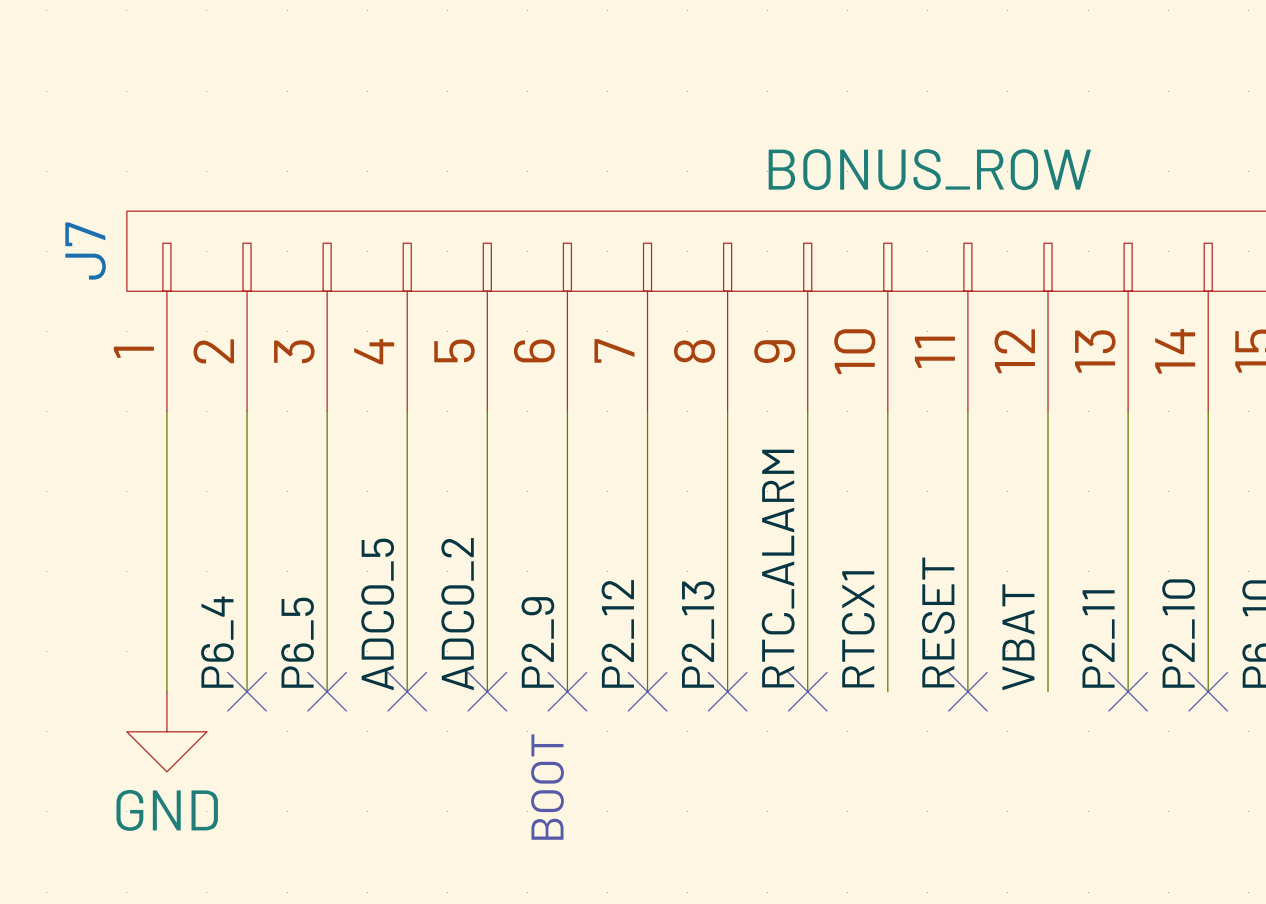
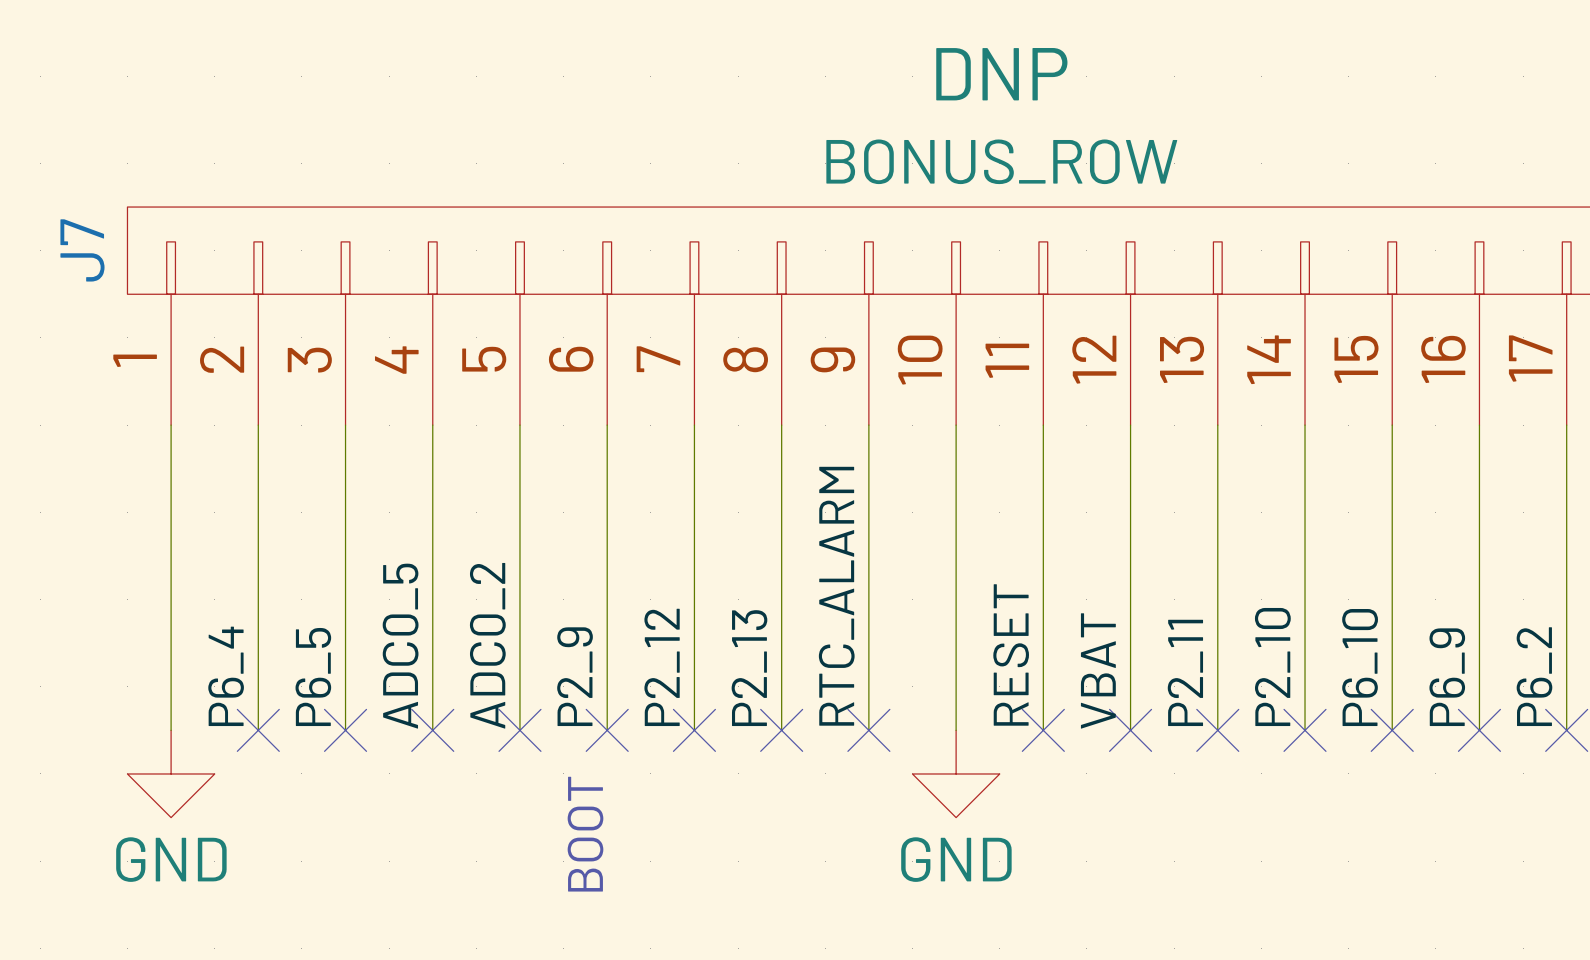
J7 text: none -> DNP (1001, 74)
label: RTCX1 (858, 629) -> none
no-connect mark: none -> (1130, 730)
power symbol: none -> GND (956, 773)

